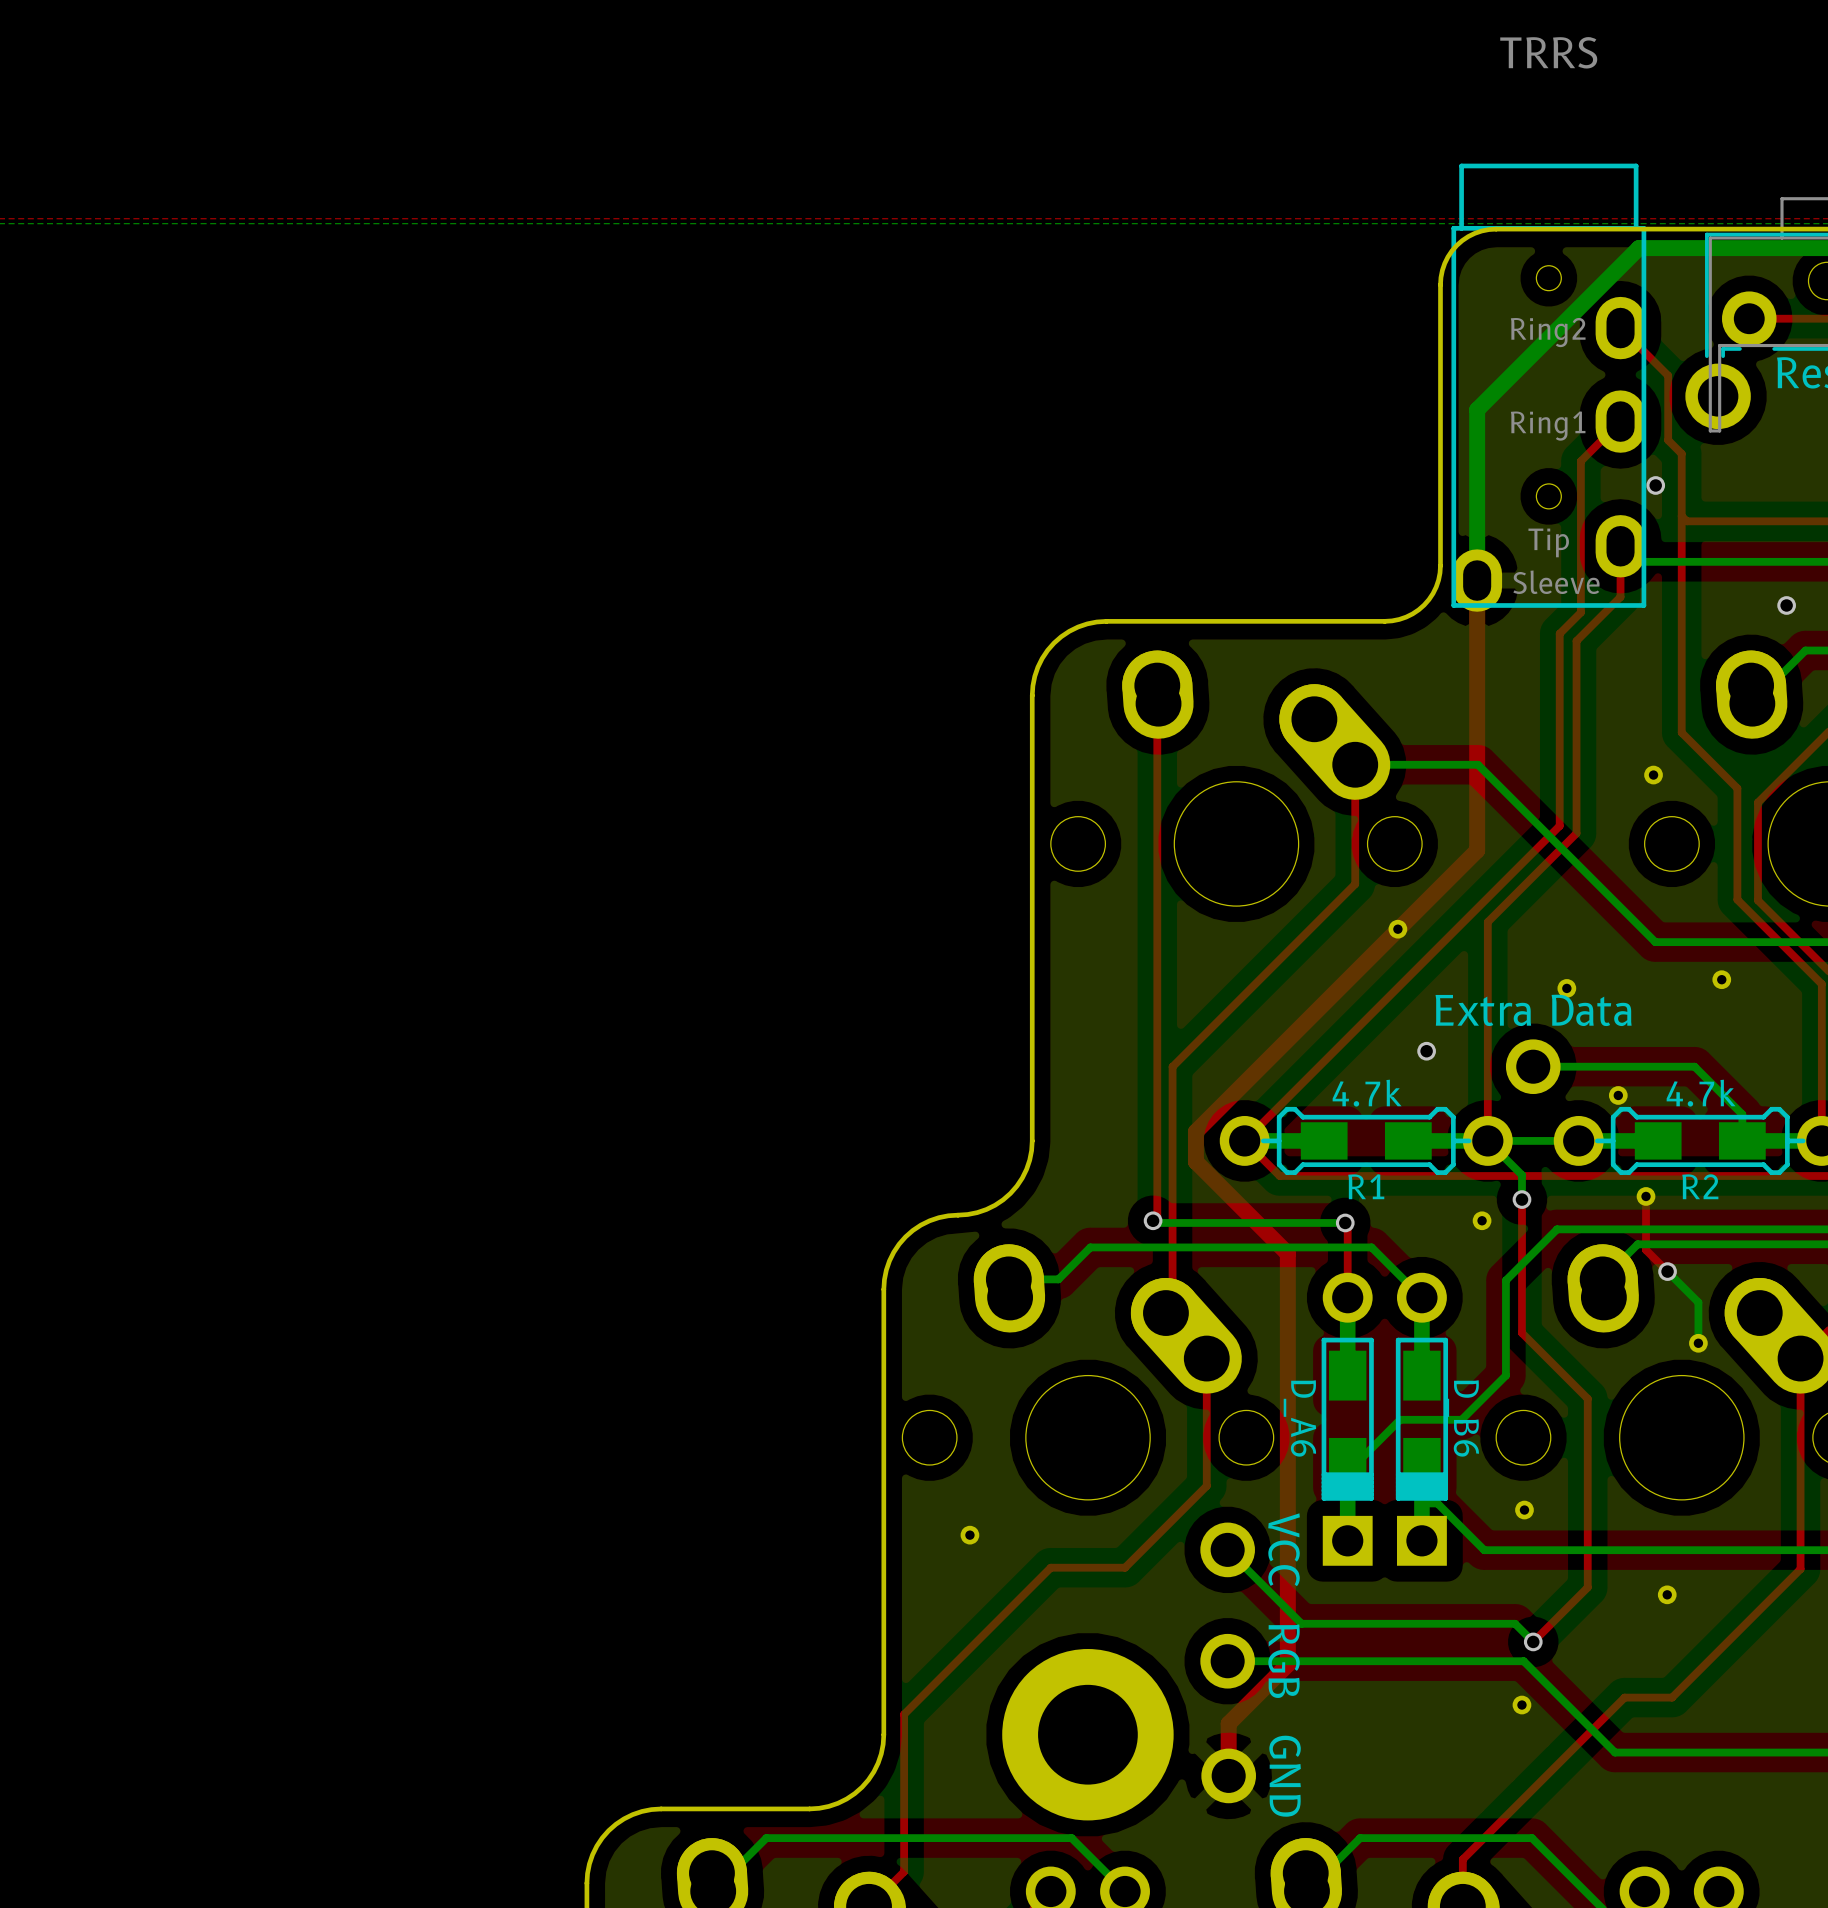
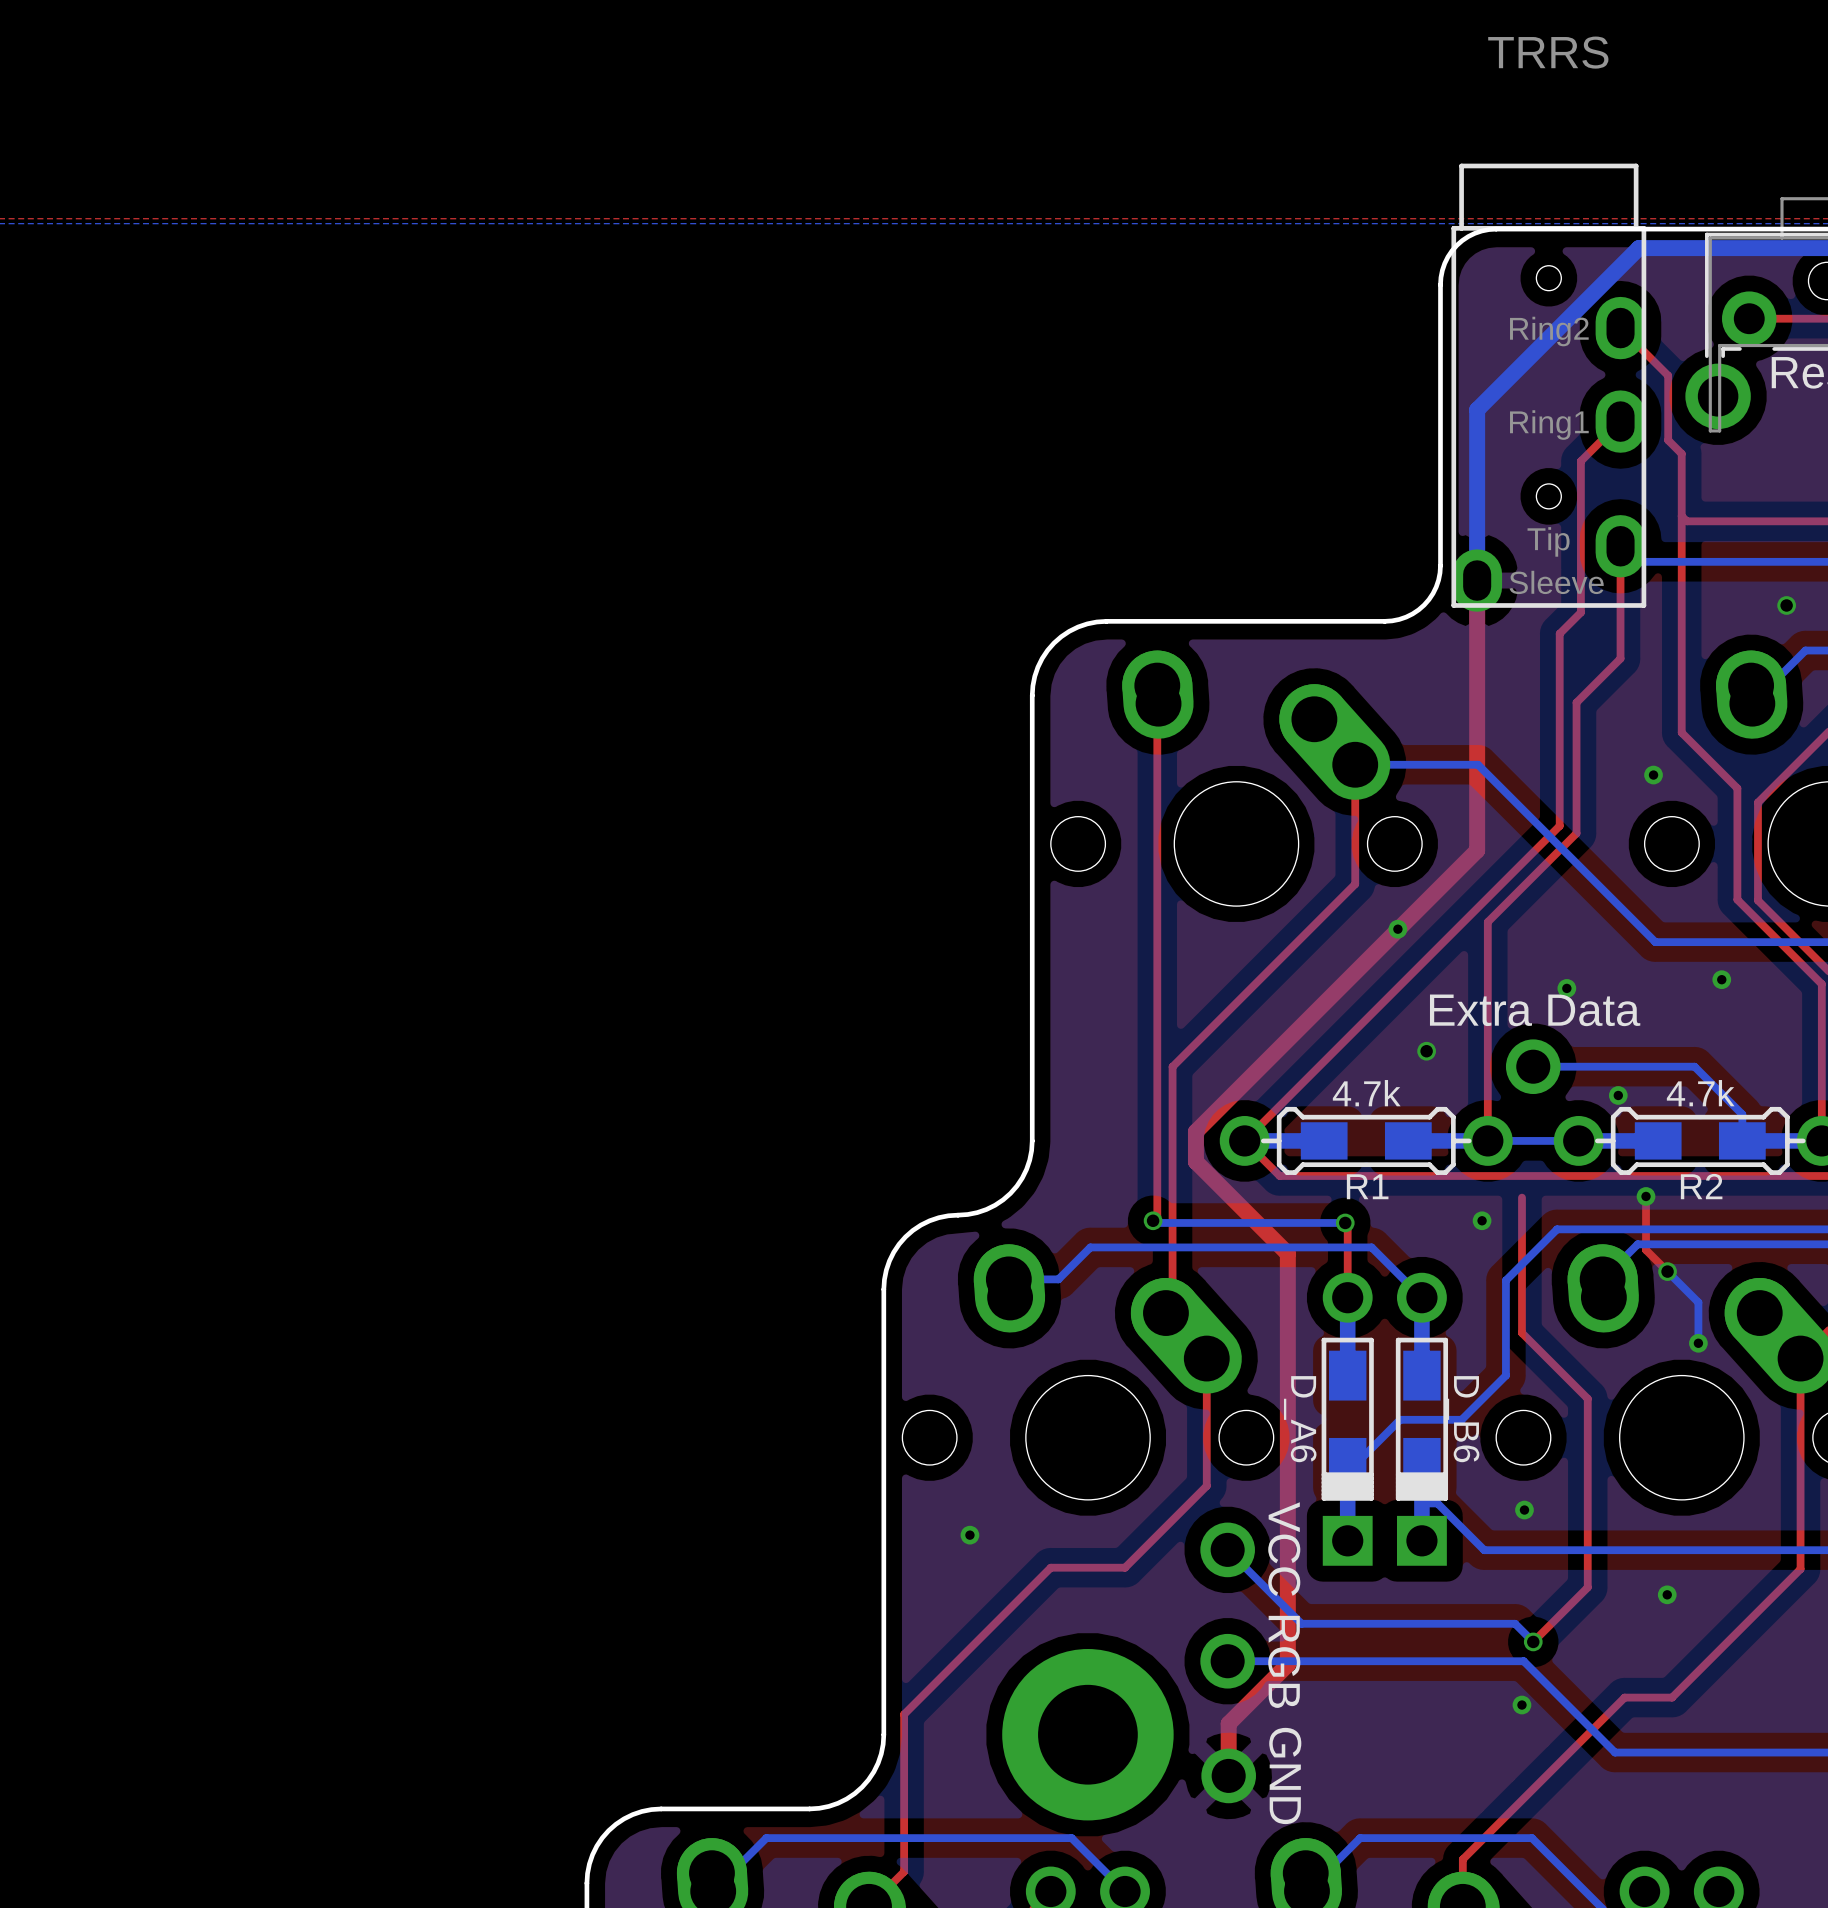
via: (1655, 485) -> none
top track: (1620, 597) (1576, 641) (1576, 702) -> (1620, 597) (1620, 658) (1576, 702)
bottom track: (1487, 1140) (1521, 1175) (1521, 1199) -> none
via: (1521, 1199) -> none

